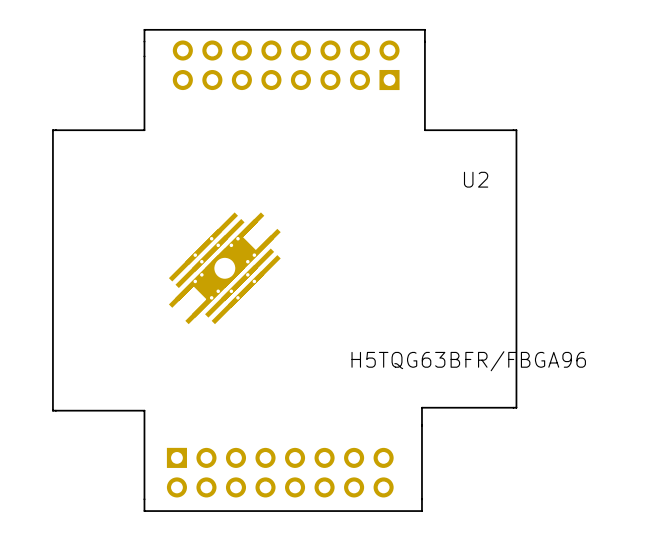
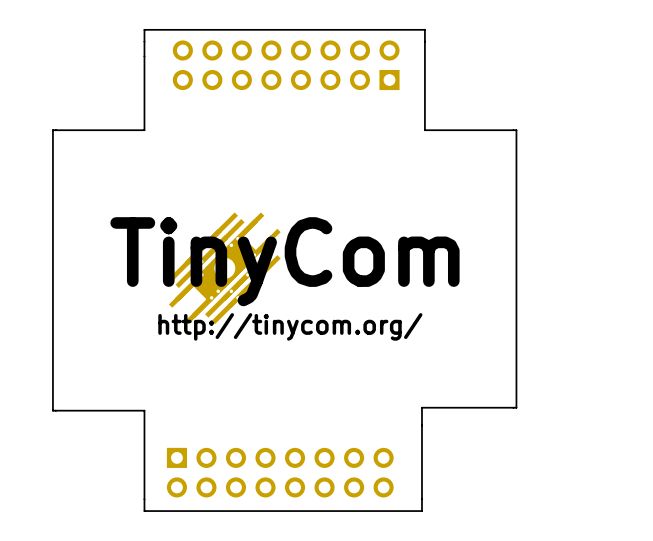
text: none -> TinyCom (284, 261)
U2: H5TQG63BFR/FBGA96 (468, 271) -> none
text: none -> http://tinycom.org/ (290, 326)

